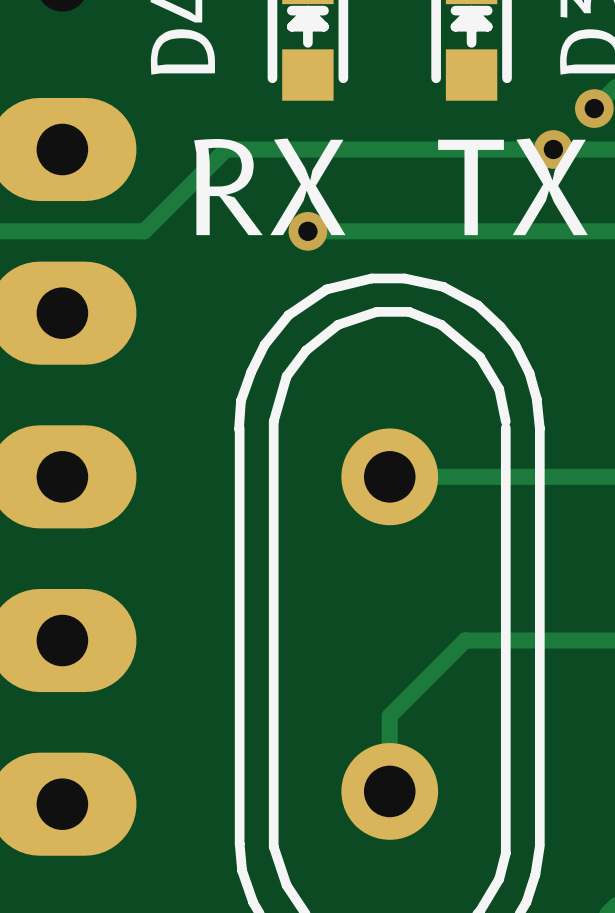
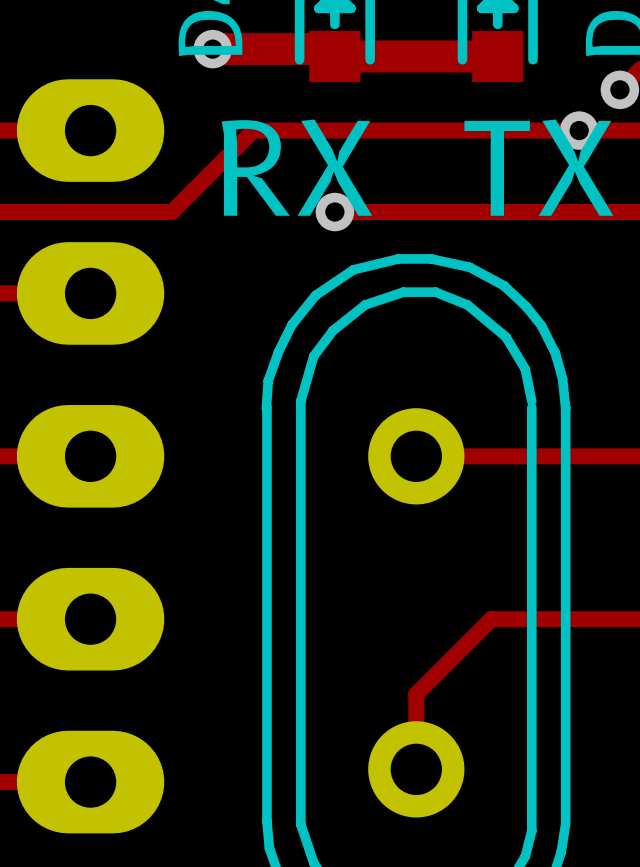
track: none -> (212, 49) (327, 49) (334, 56) (497, 56)
via: none -> (212, 49)

